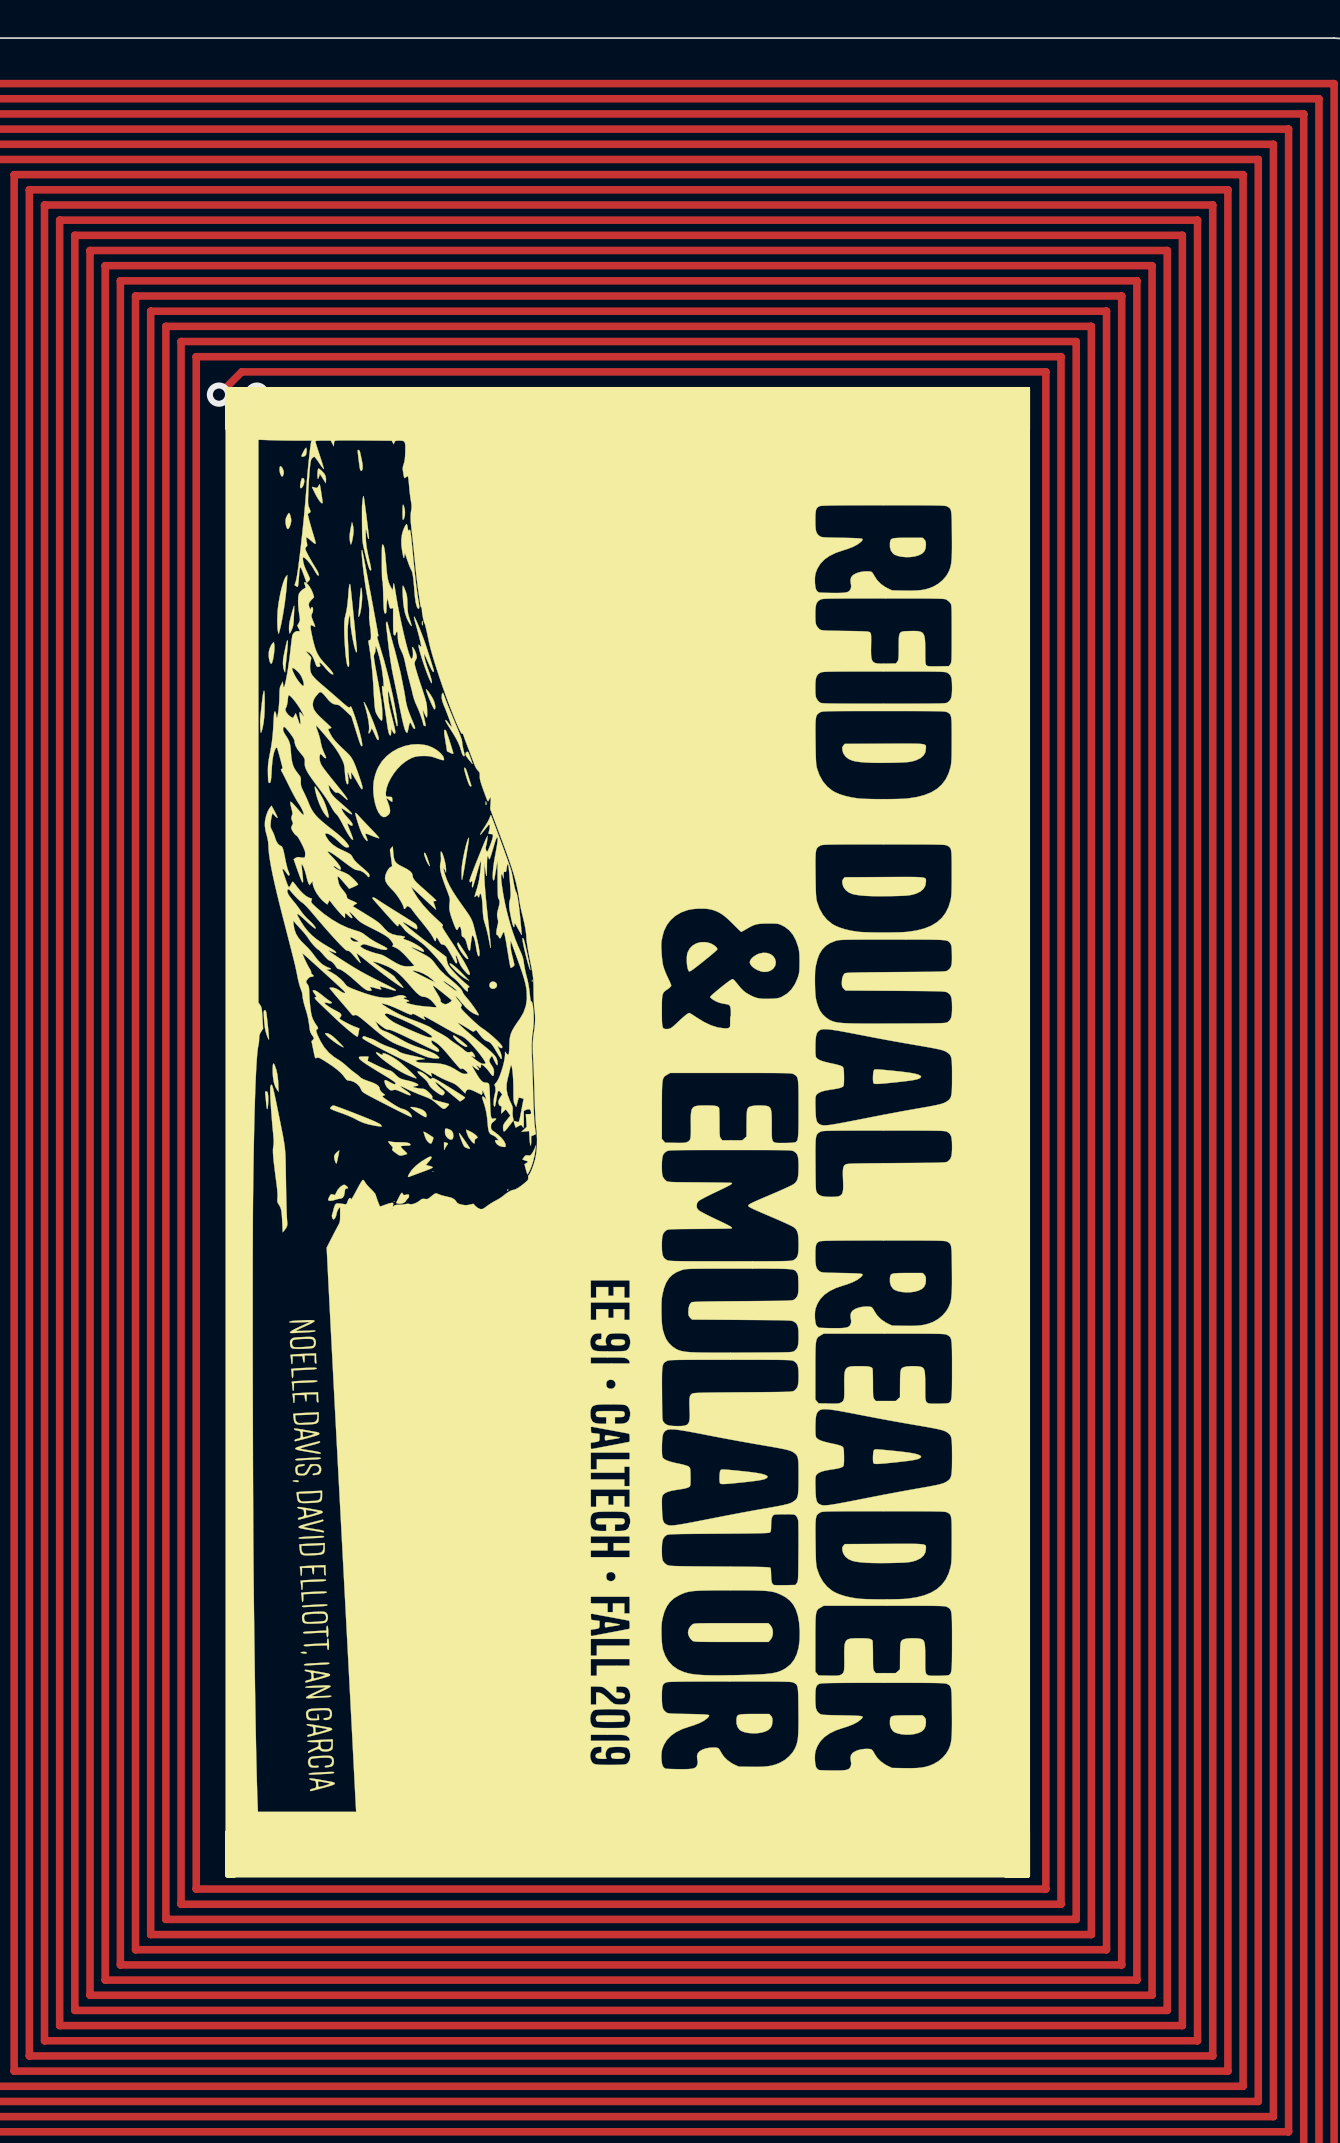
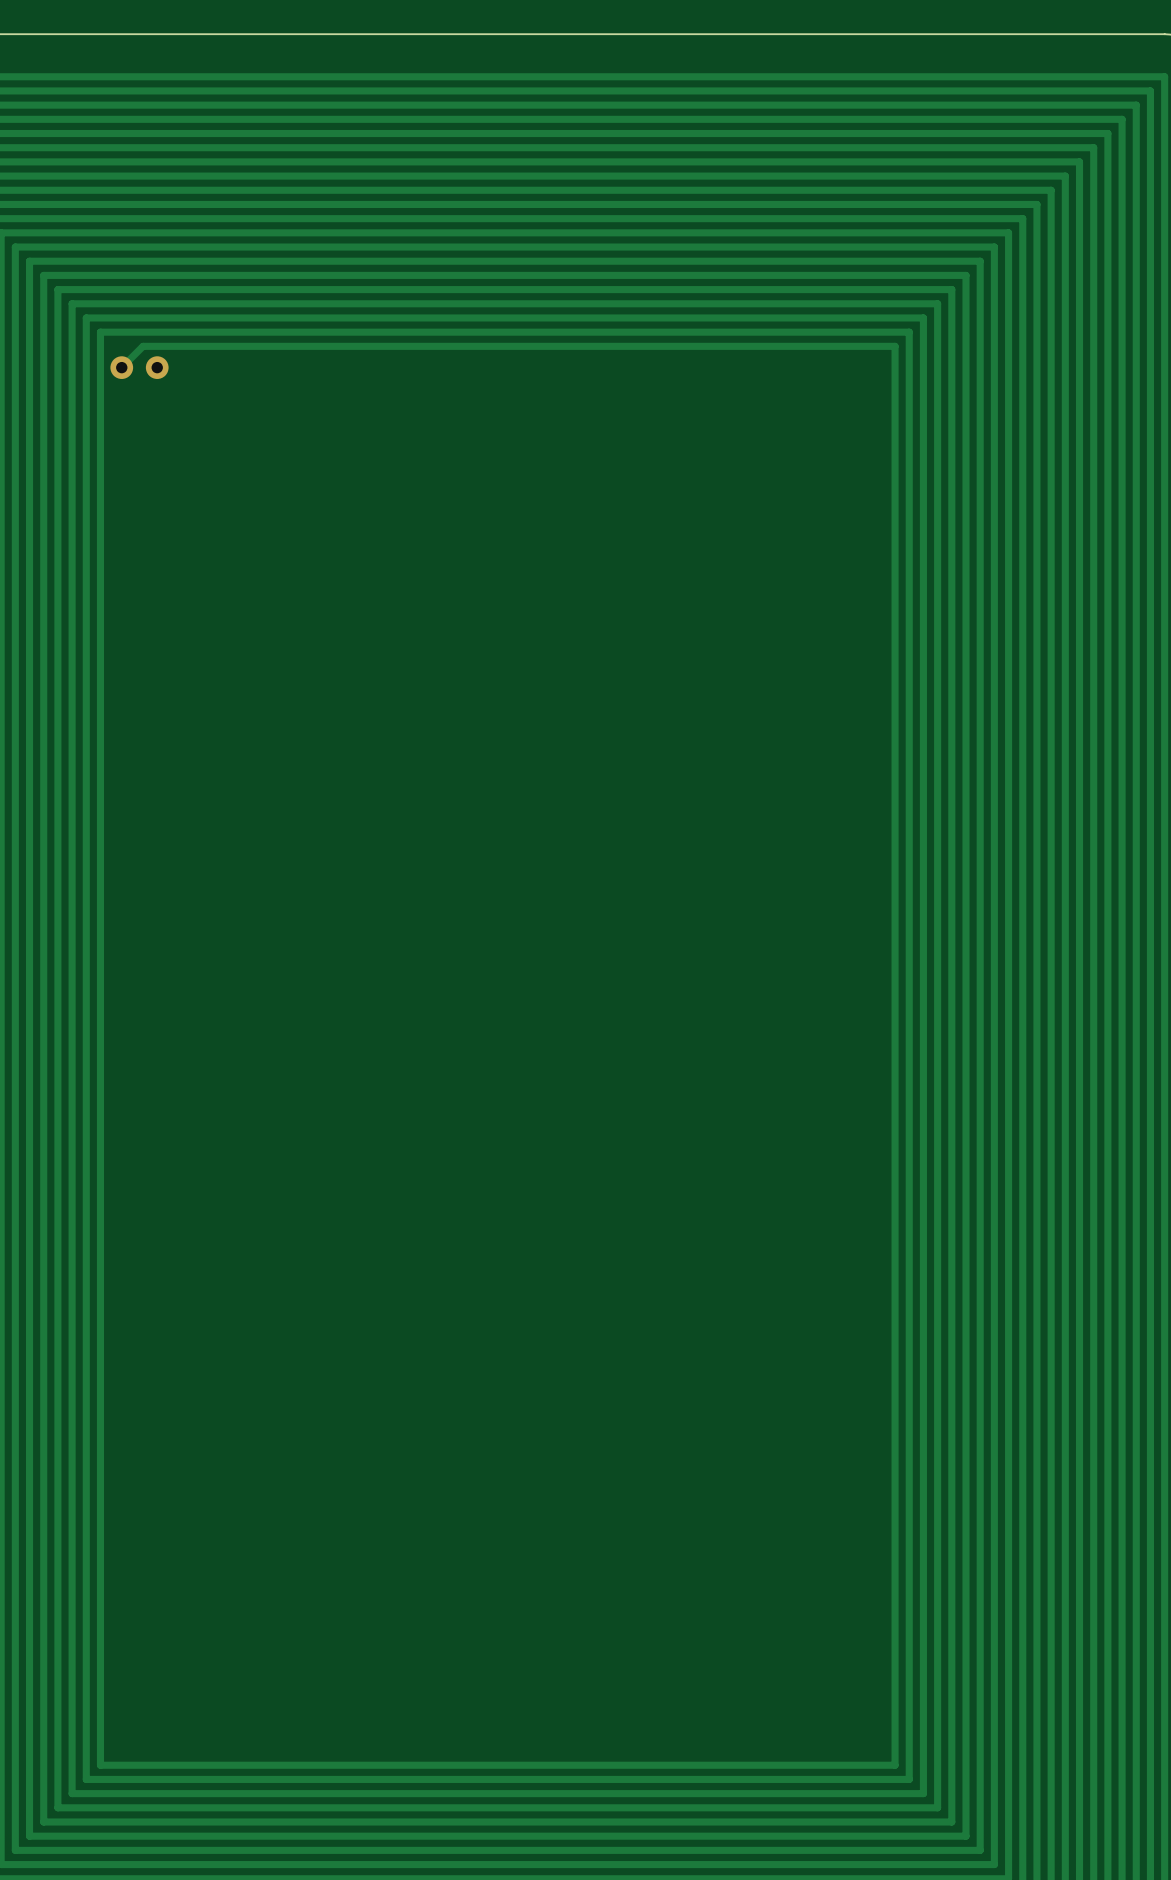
drawing: [225, 386, 1031, 1878] -> none

